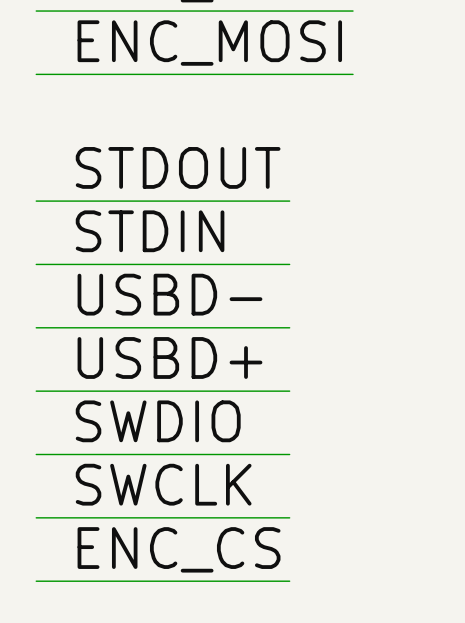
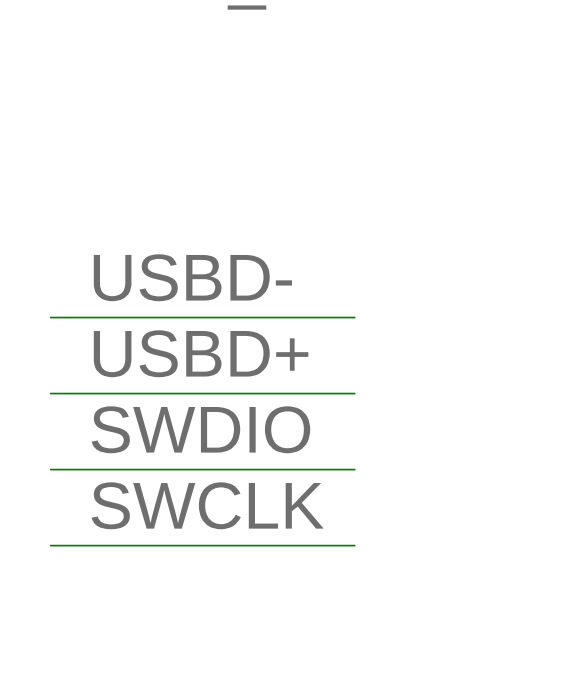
wire: (36, 74) (353, 74) -> none
label: STDOUT (178, 167) -> none
wire: (36, 201) (289, 201) -> none
label: STDIN (150, 231) -> none
wire: (36, 264) (289, 264) -> none
label: ENC_CS (179, 549) -> none
wire: (36, 581) (289, 581) -> none

